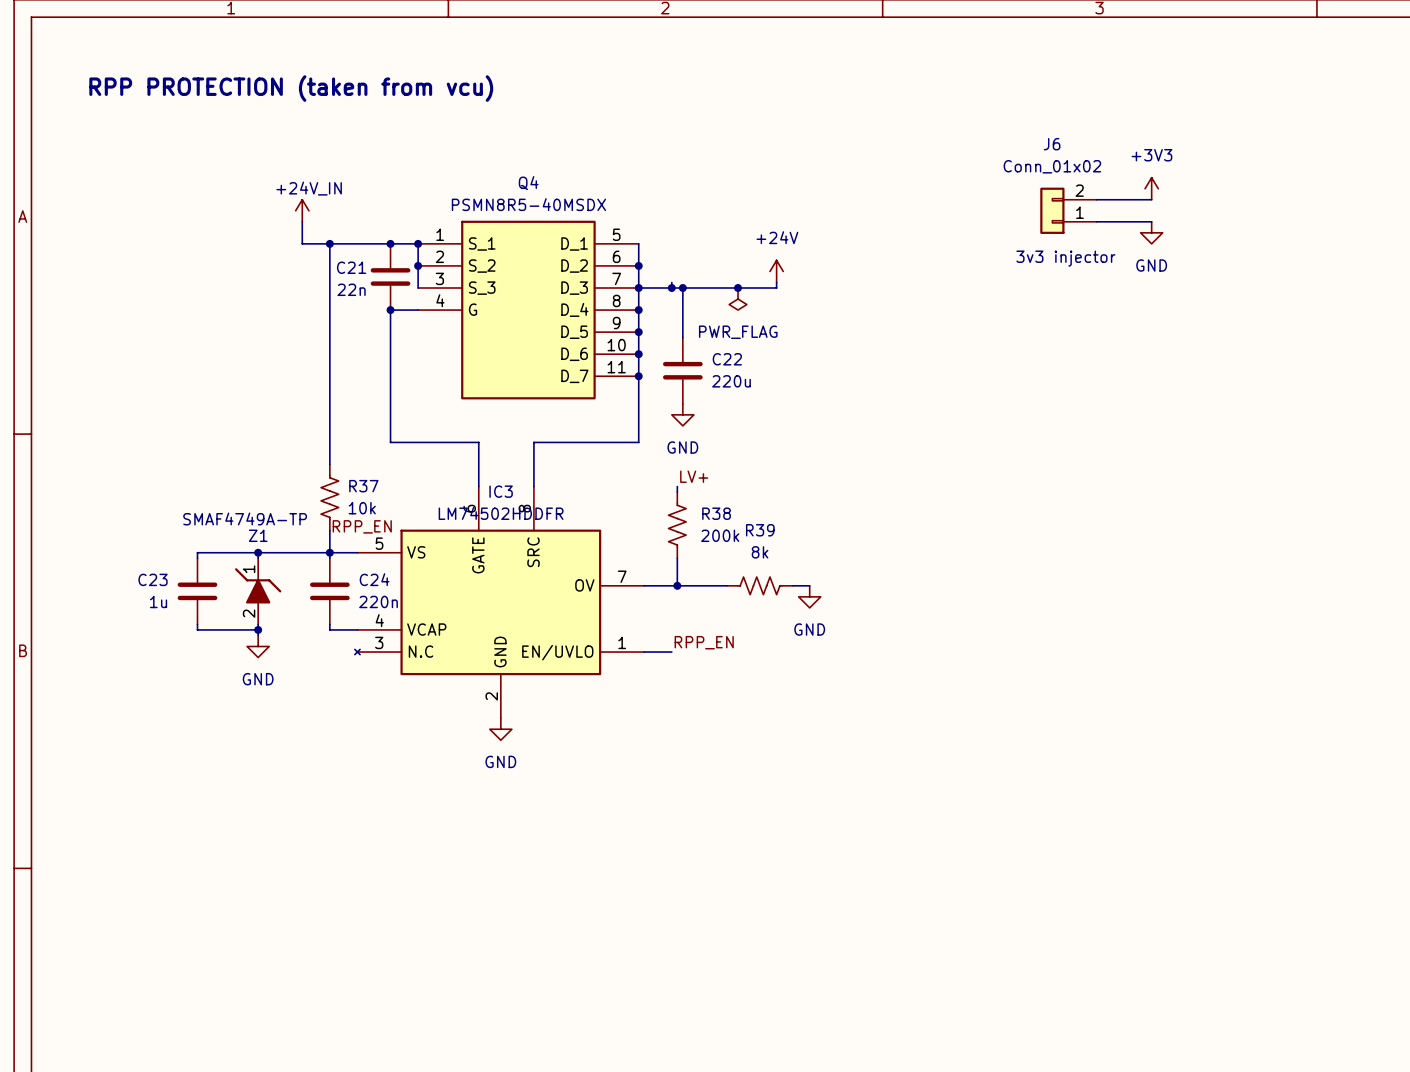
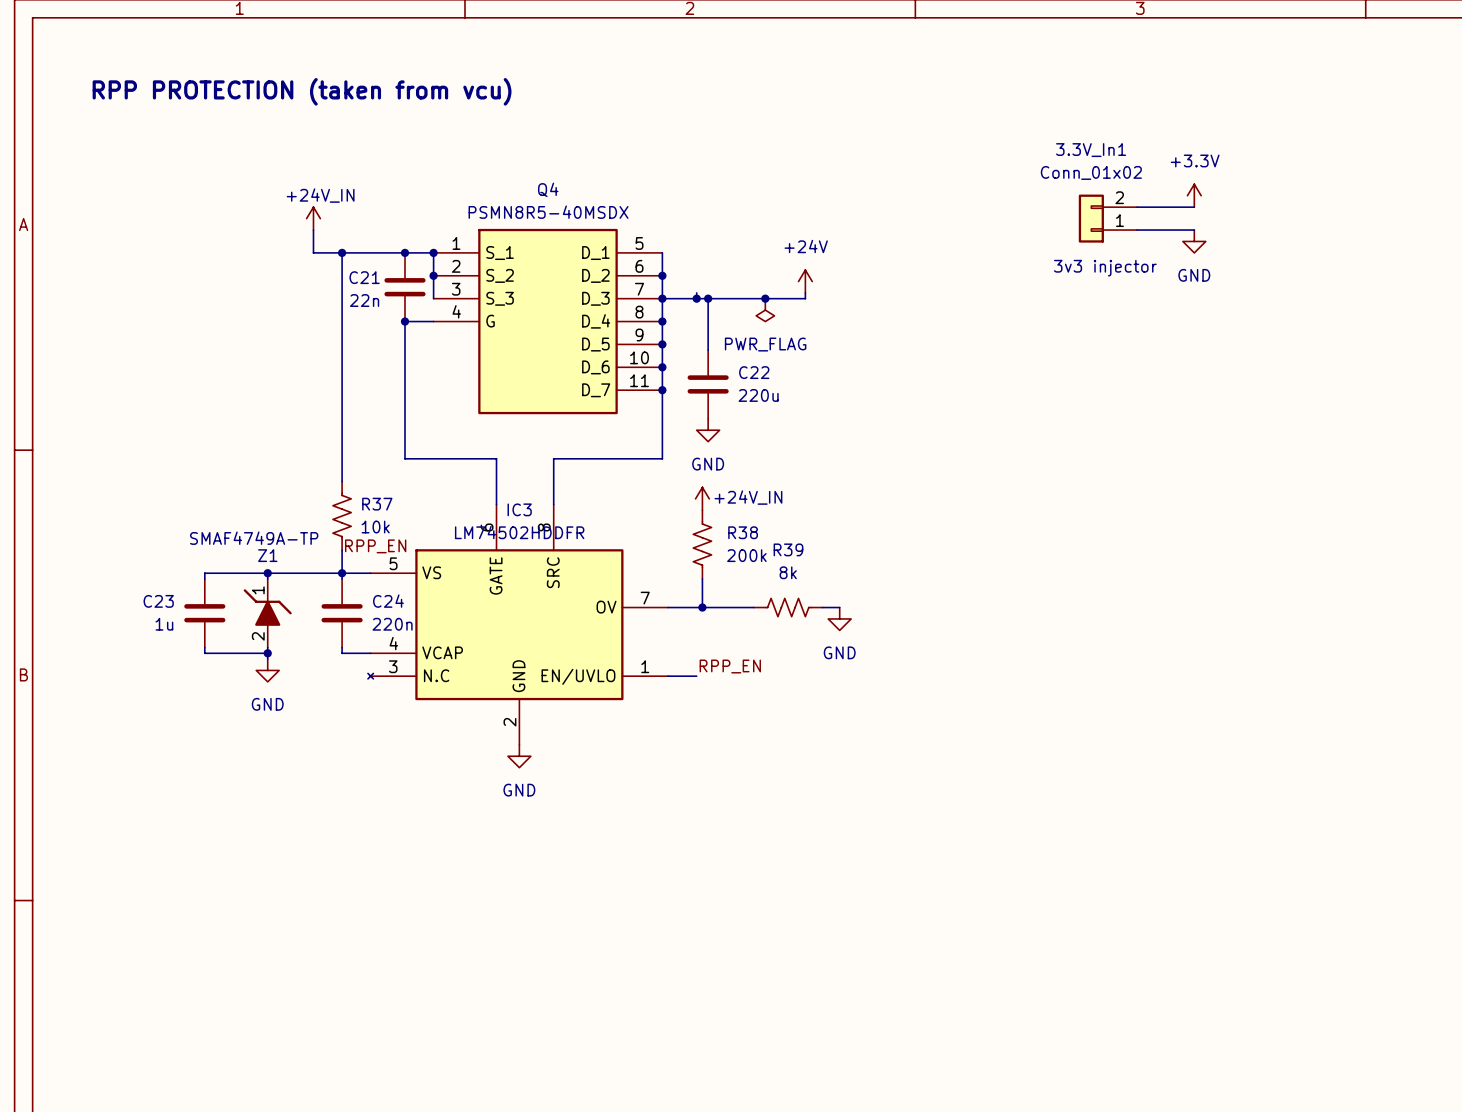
J6 name: J6 (1052, 144) -> 3.3V_In1 (1091, 150)
power symbol: +3V3 (1151, 188) -> +3.3V (1194, 195)
label: LV+ (694, 476) -> none
power symbol: none -> +24V_IN (702, 498)

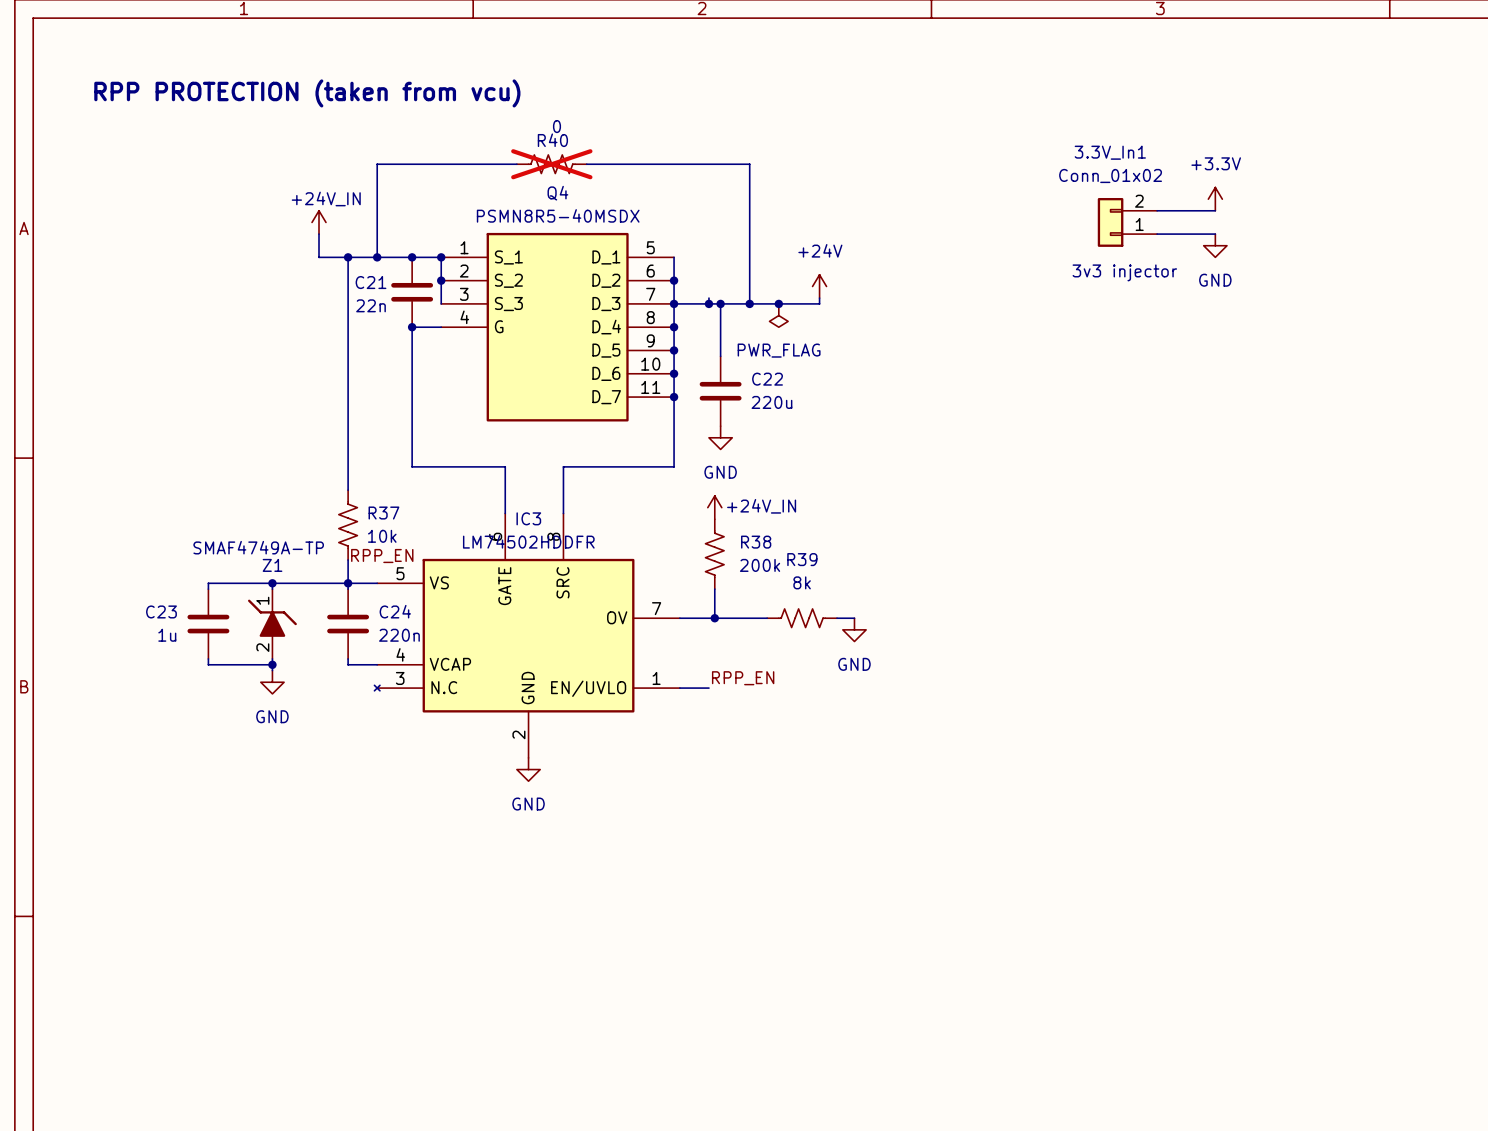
wire: none -> (516, 164) (377, 164) (377, 257)
R40: none -> 0 (551, 164)
wire: none -> (586, 164) (749, 164) (749, 303)
junction: none -> (377, 257)
junction: none -> (749, 303)

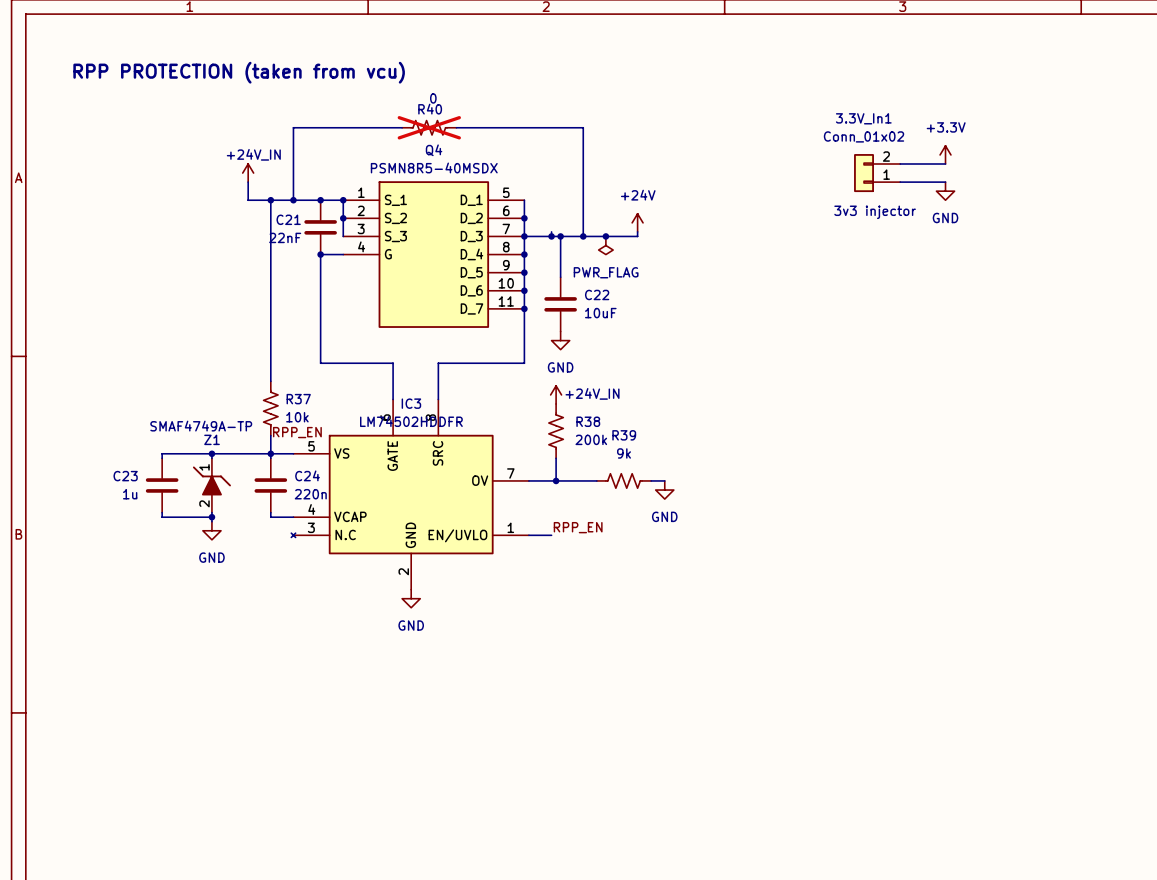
C21 value: 22n (371, 305) -> 22nF (285, 237)
C22 value: 220u (771, 402) -> 10uF (600, 313)
R39 value: 8k (802, 582) -> 9k (624, 453)

